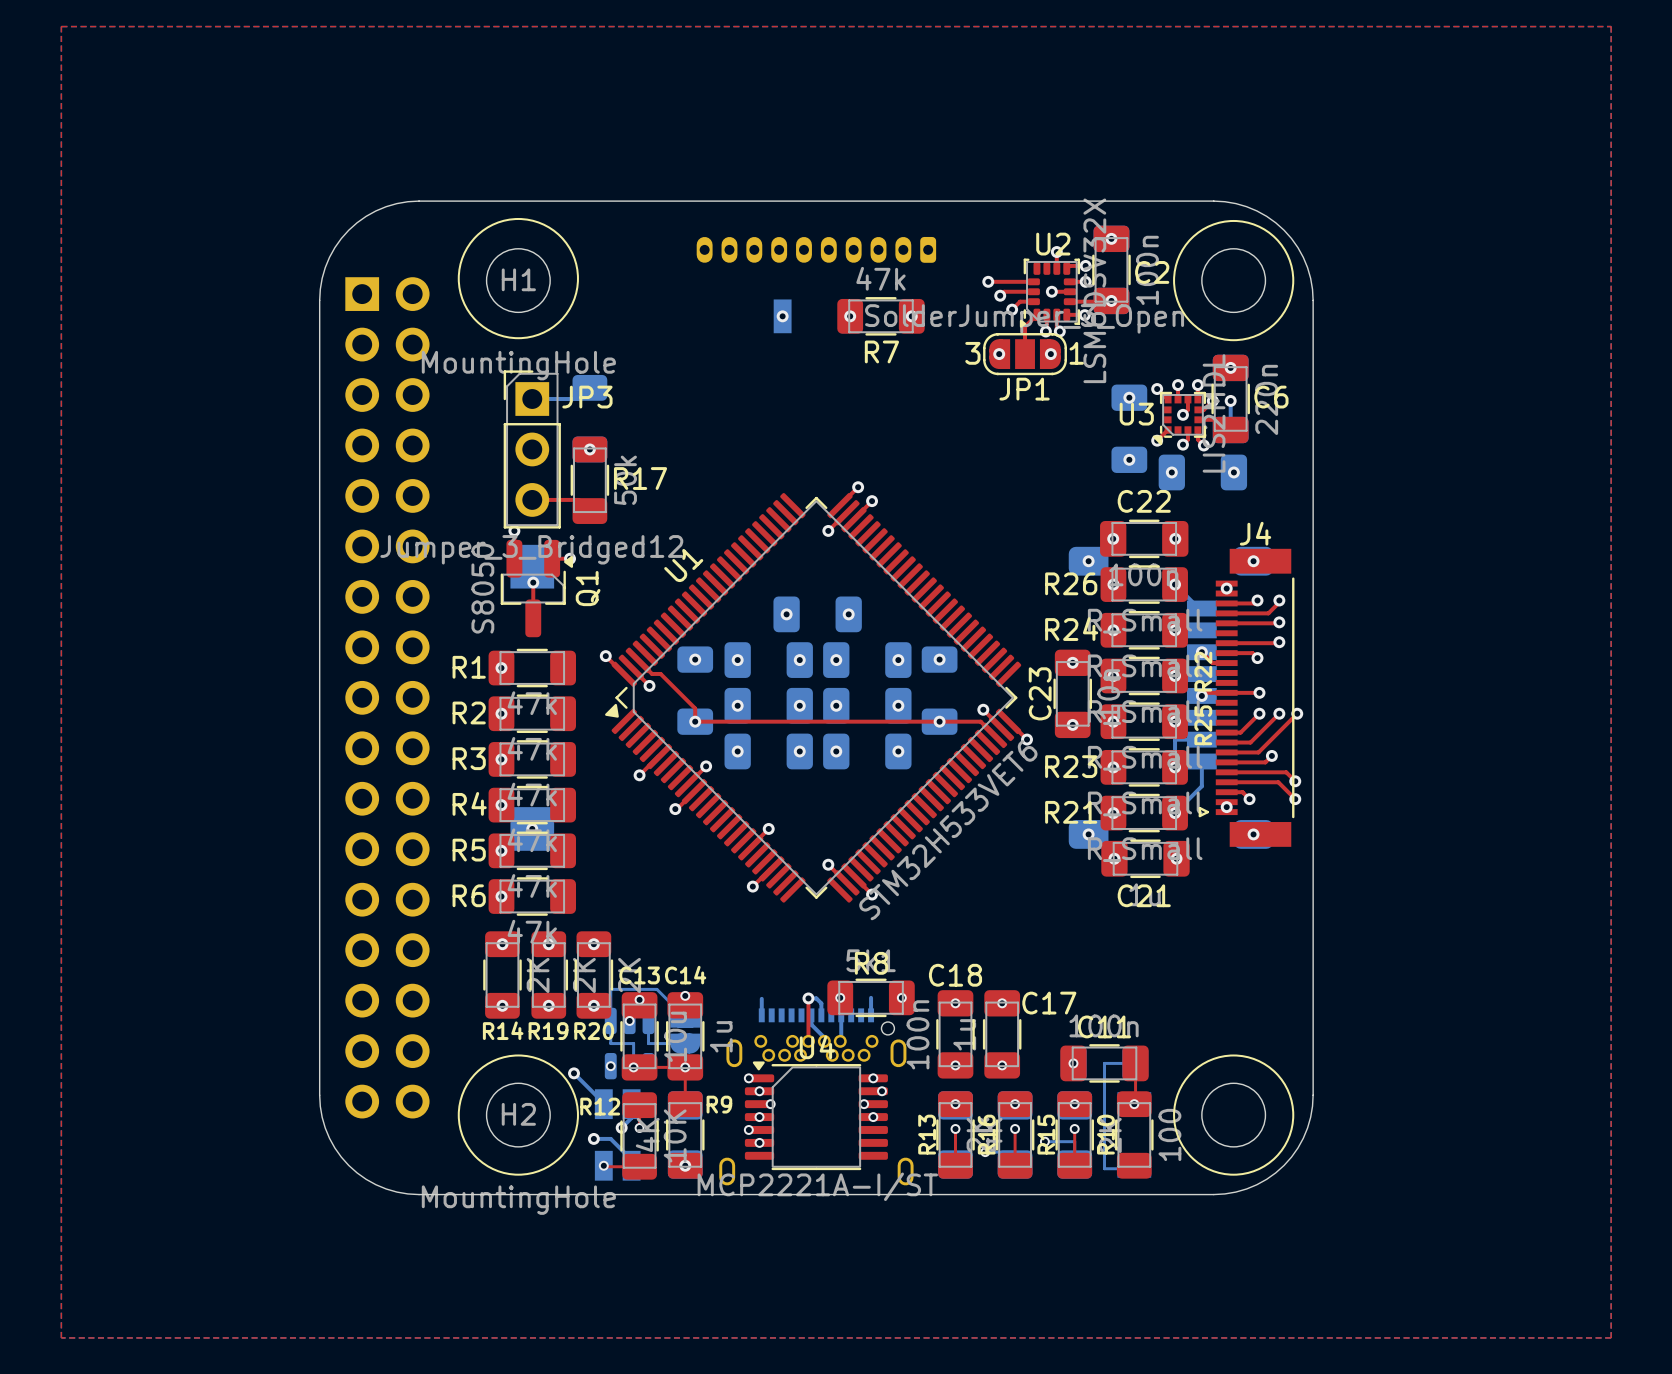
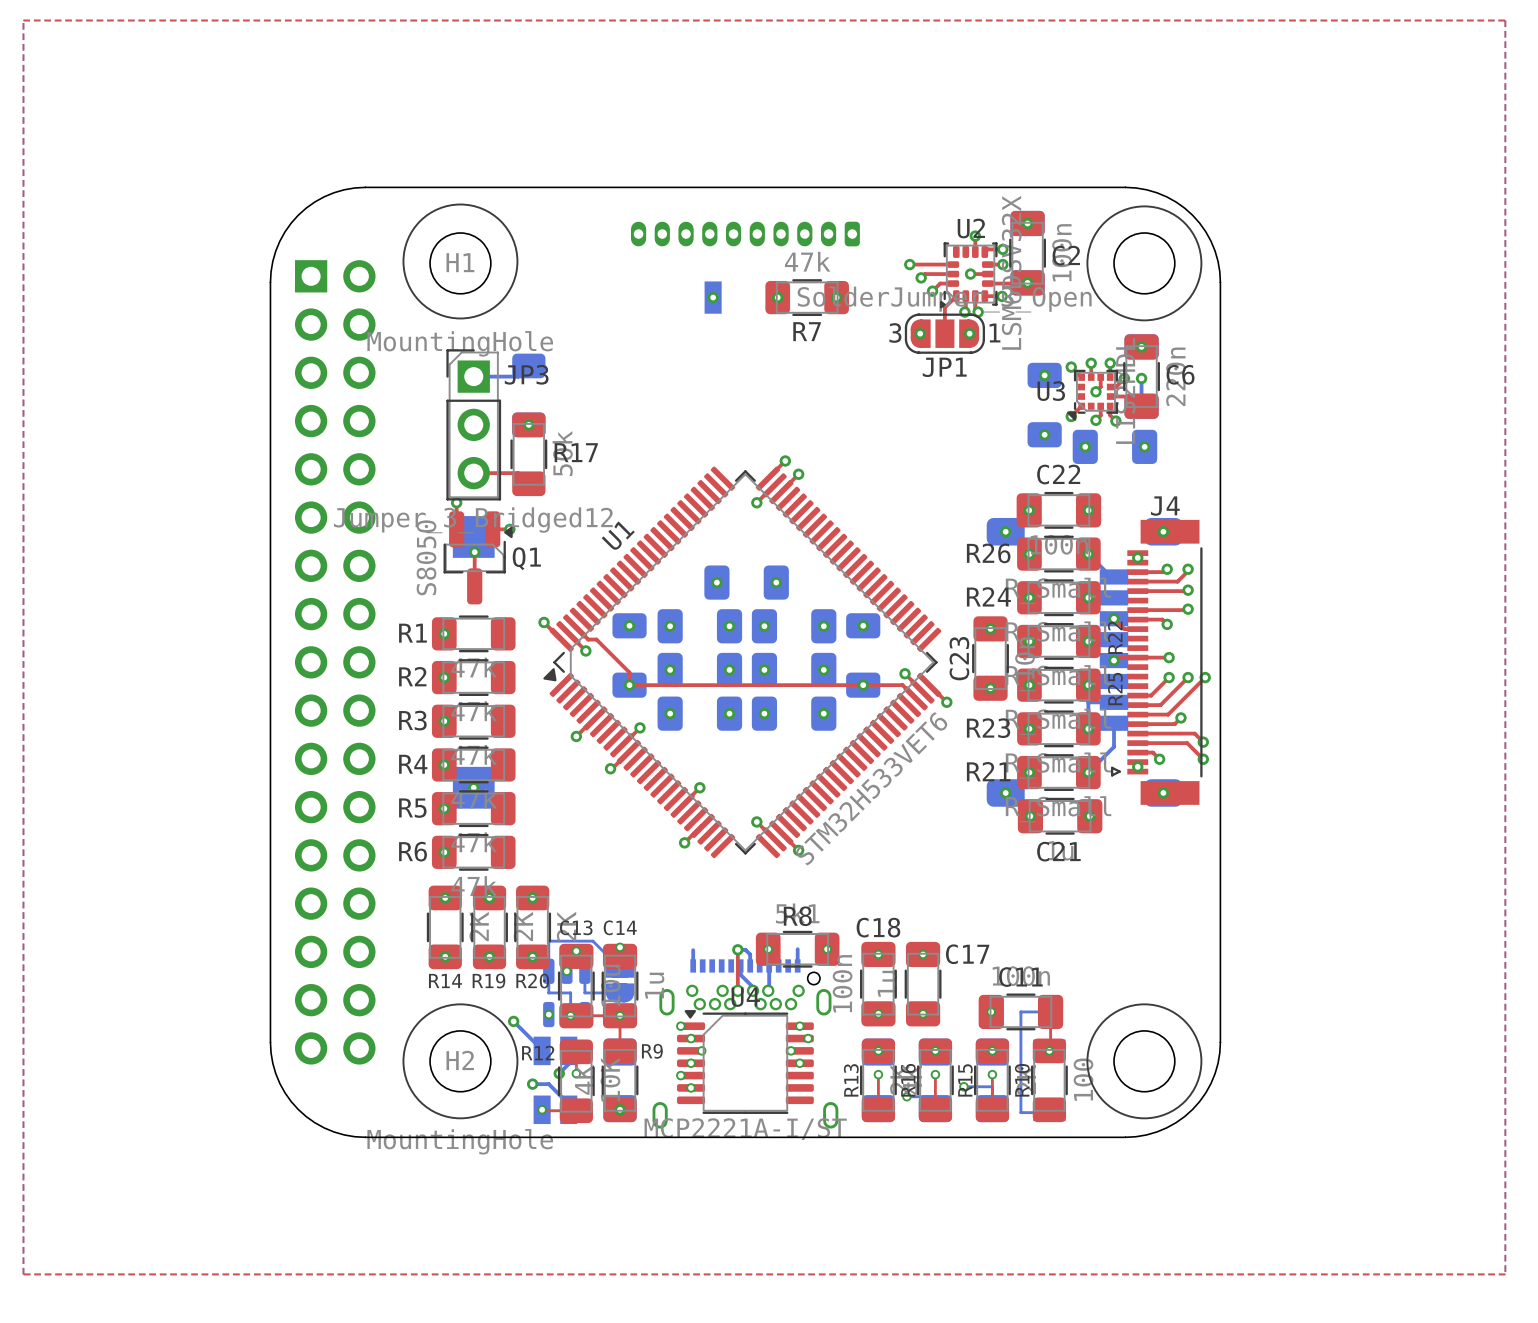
Q1 name rotation: 0° (588, 588) -> 90° clockwise (526, 558)

